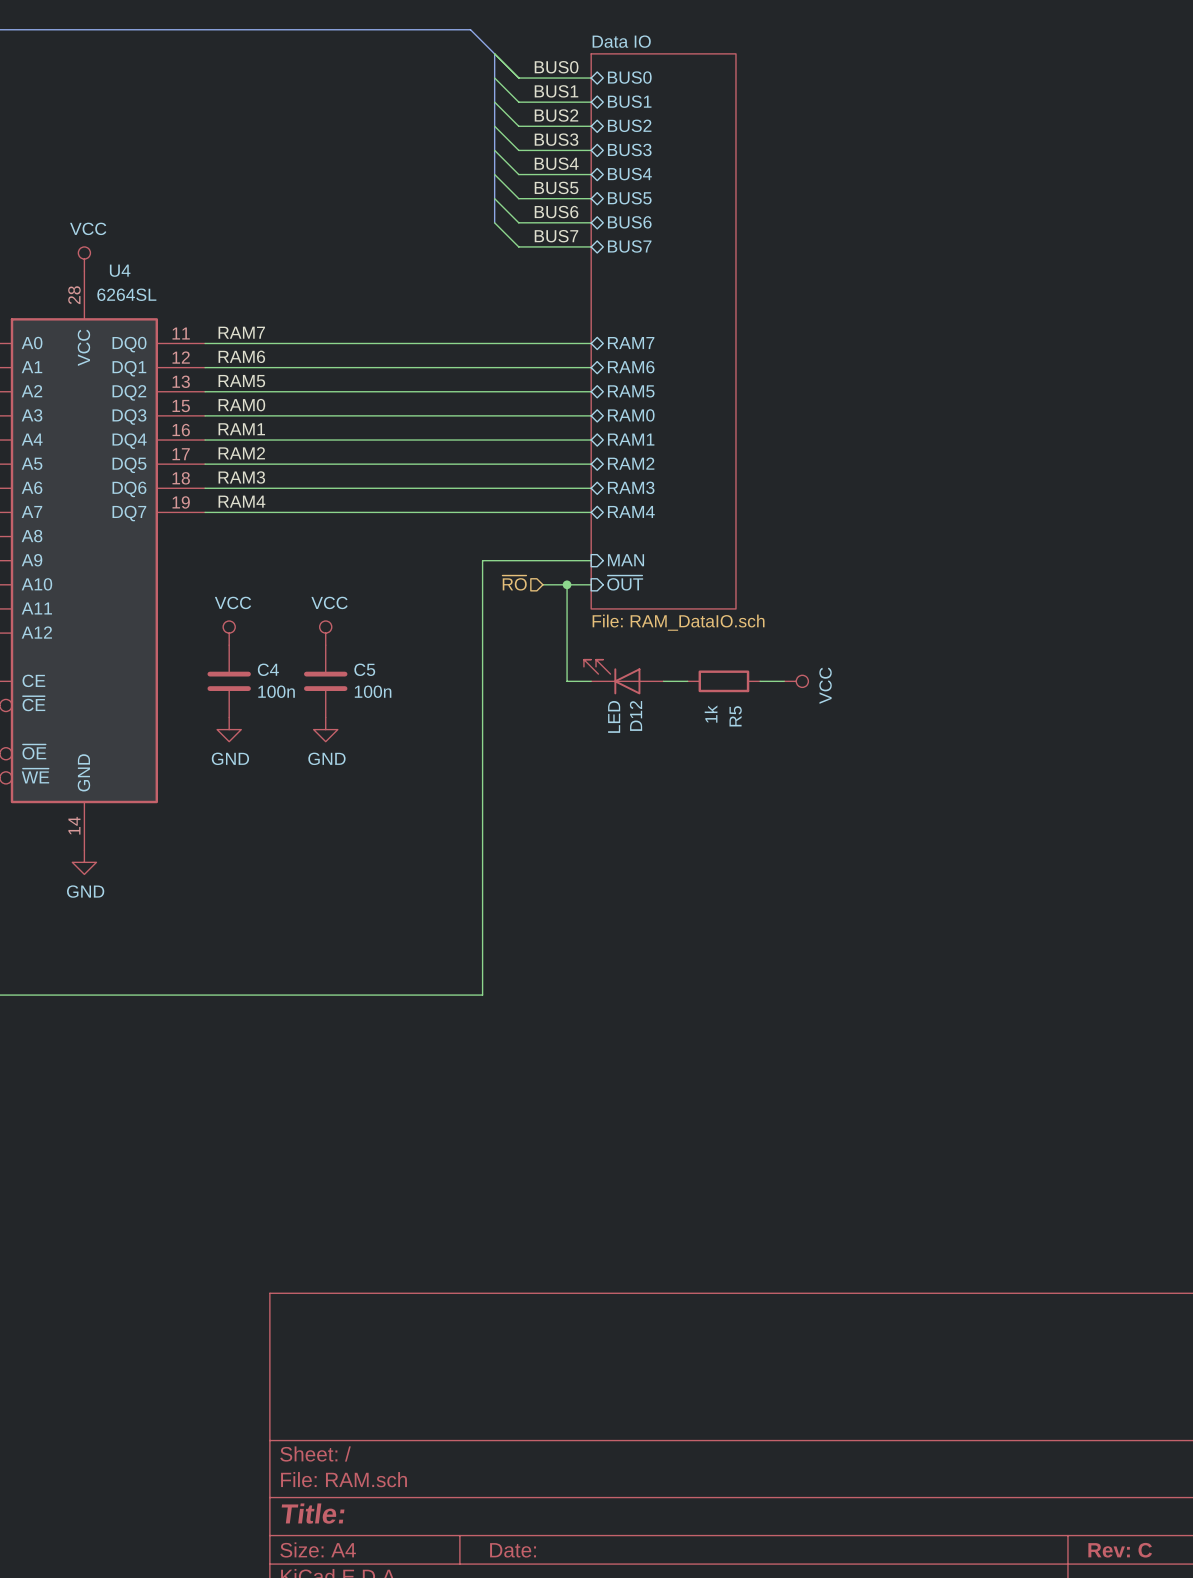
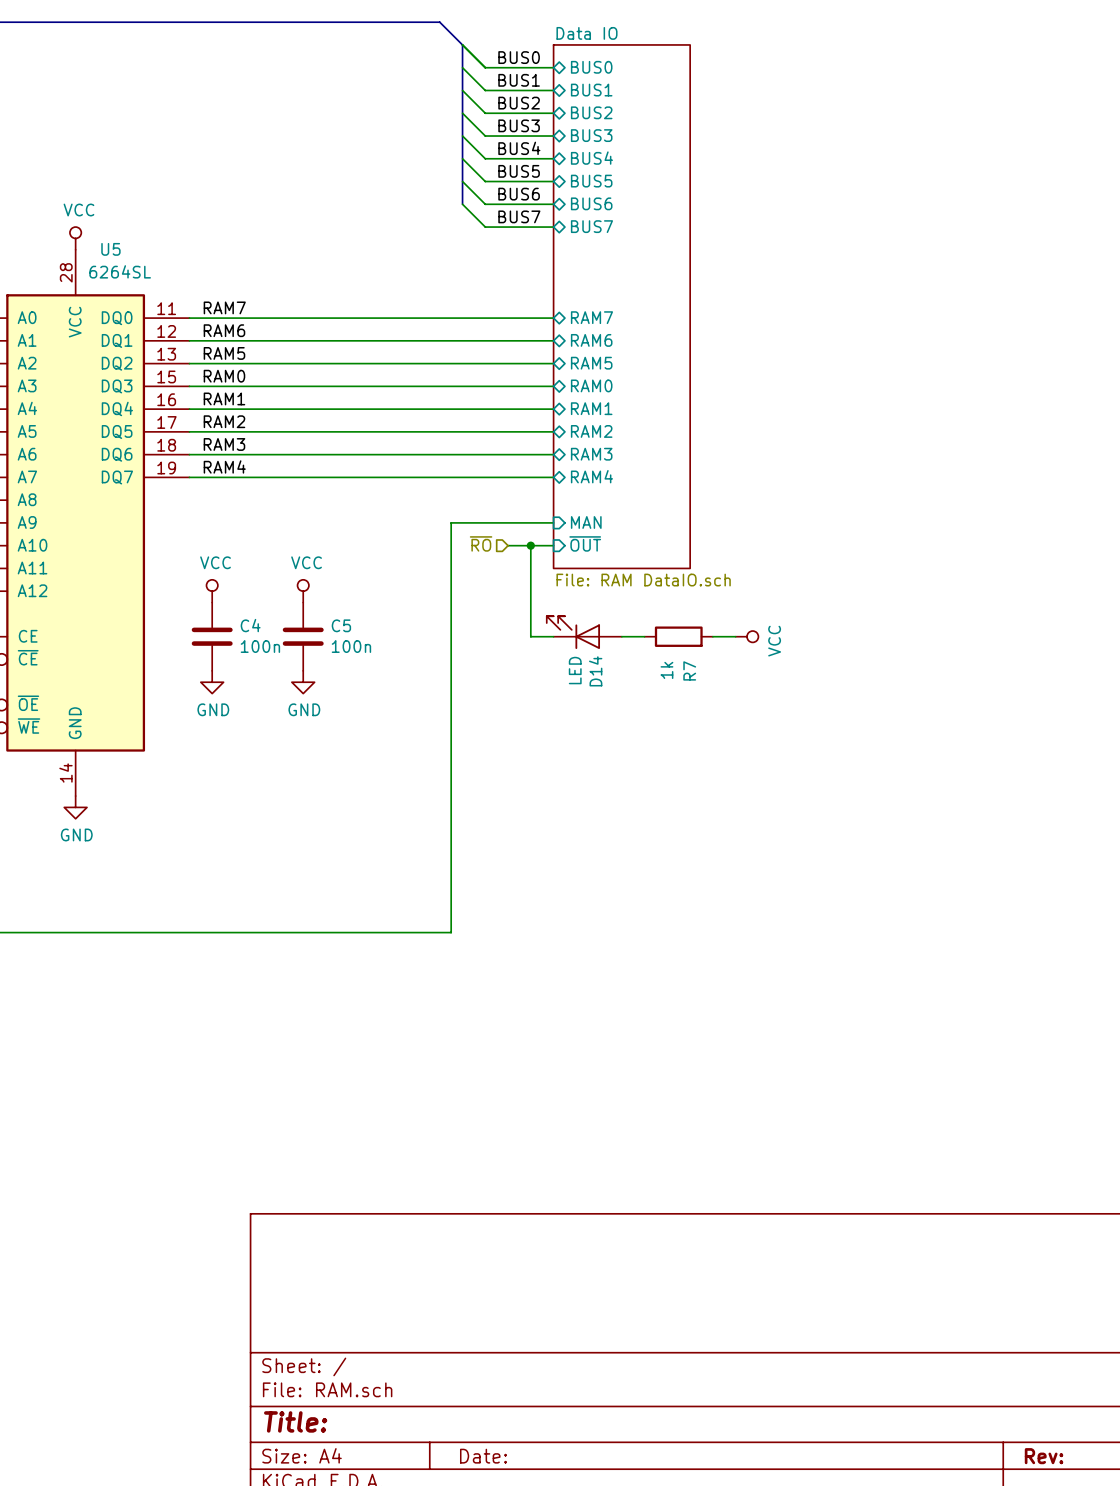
U4 name: U4 (120, 270) -> U5 (110, 249)
sheet Data IO value: File: RAM_DataIO.sch (678, 622) -> File: RAM DataIO.sch (643, 580)
D12 name: D12 (636, 715) -> D14 (595, 671)
R5 name: R5 (735, 716) -> R7 (689, 670)
title block: Rev: C (1120, 1550) -> Rev: (1044, 1456)

